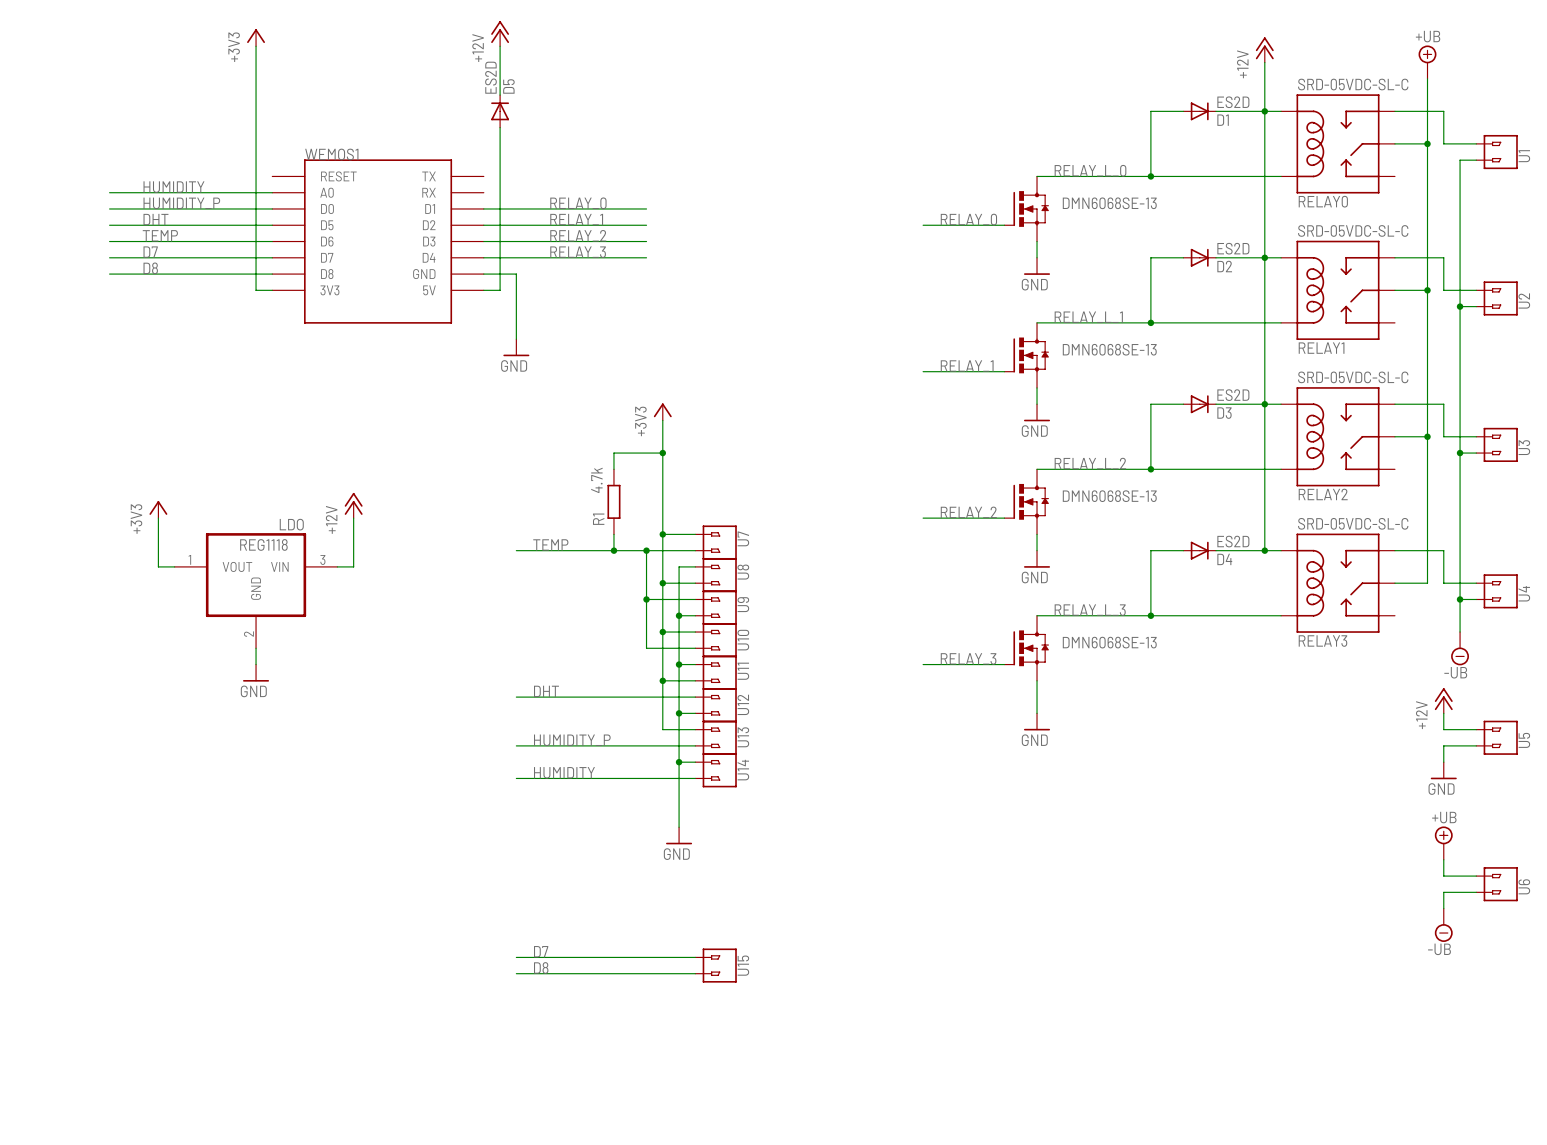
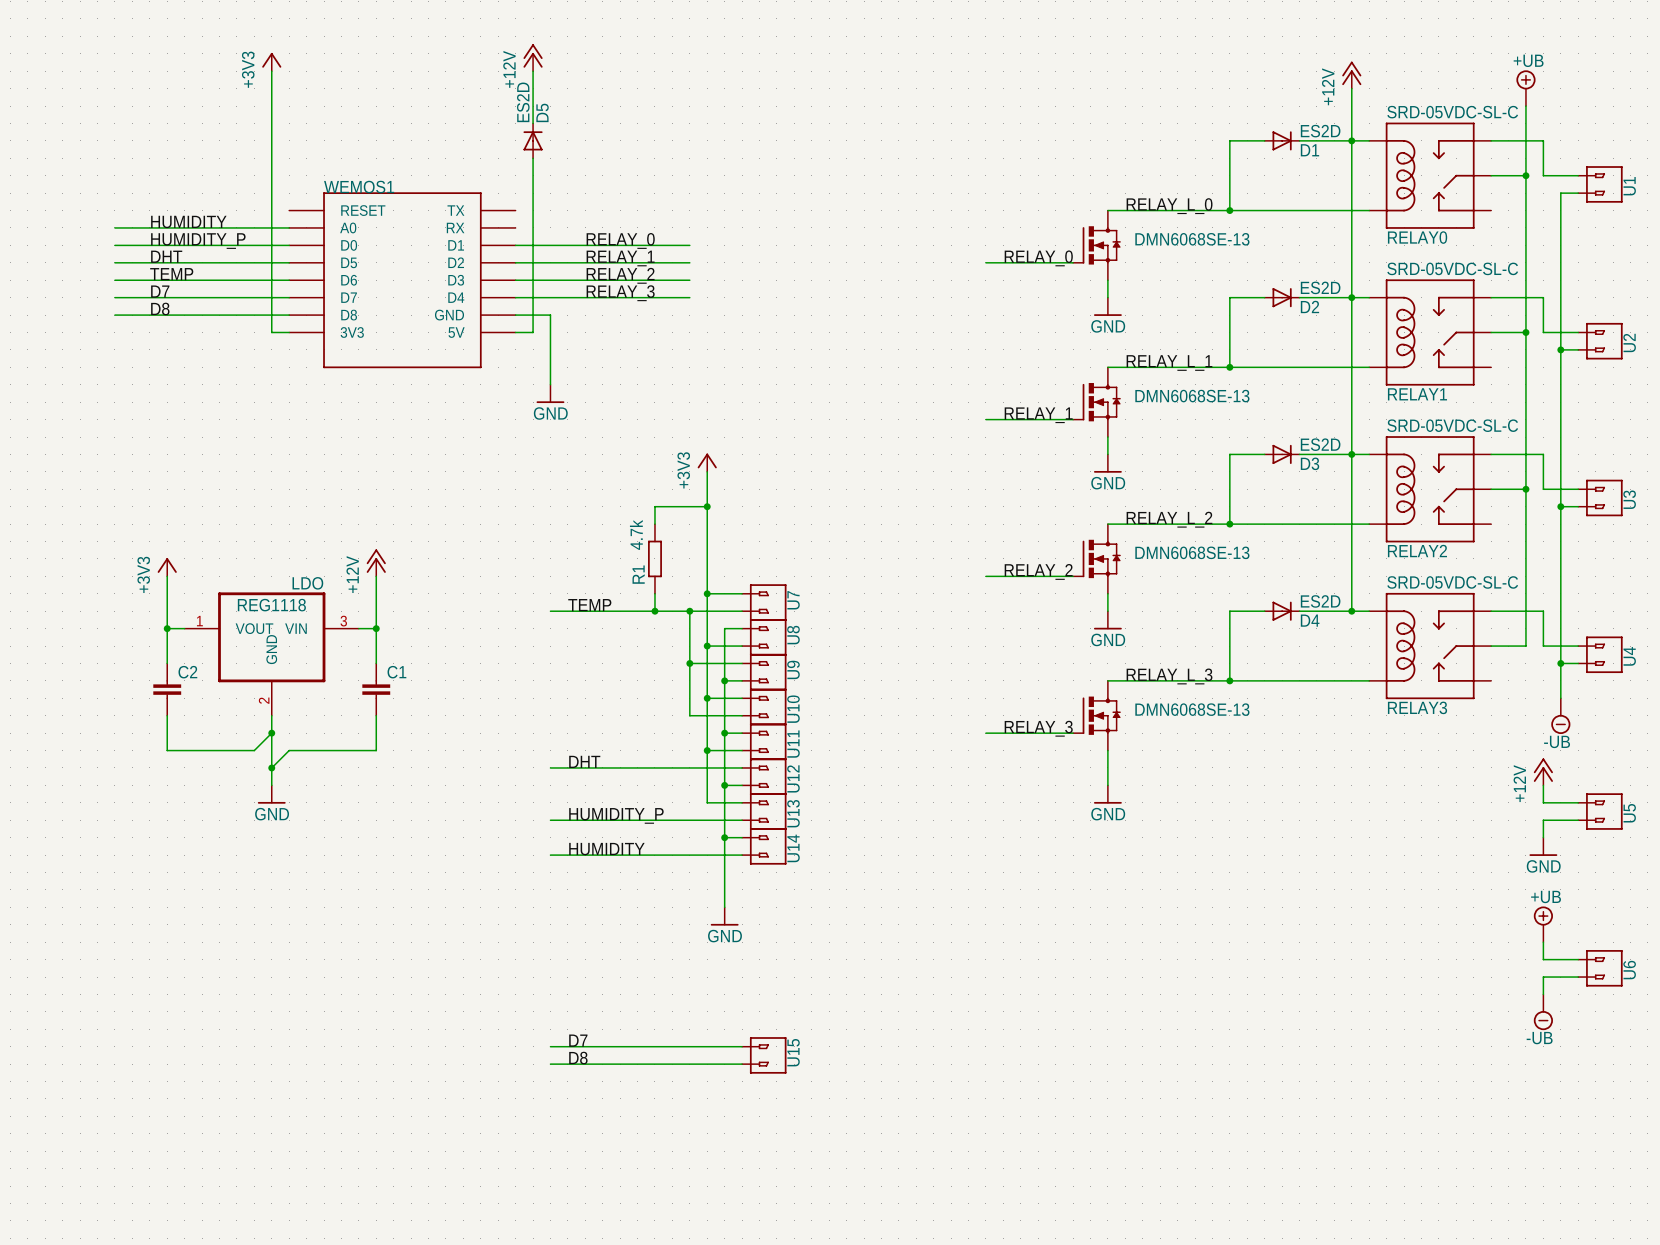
wire: none -> (167, 628) (167, 663)
junction: none -> (167, 628)
wire: none -> (376, 628) (376, 663)
junction: none -> (376, 628)
C2: none -> (167, 689)
C1: none -> (376, 689)
wire: none -> (167, 715) (167, 750) (254, 750) (271, 733) (271, 785)
wire: none -> (376, 715) (376, 750) (289, 750) (271, 767)
junction: none -> (271, 733)
power symbol position: GND (256, 673) -> GND (271, 794)
junction: none -> (271, 767)

